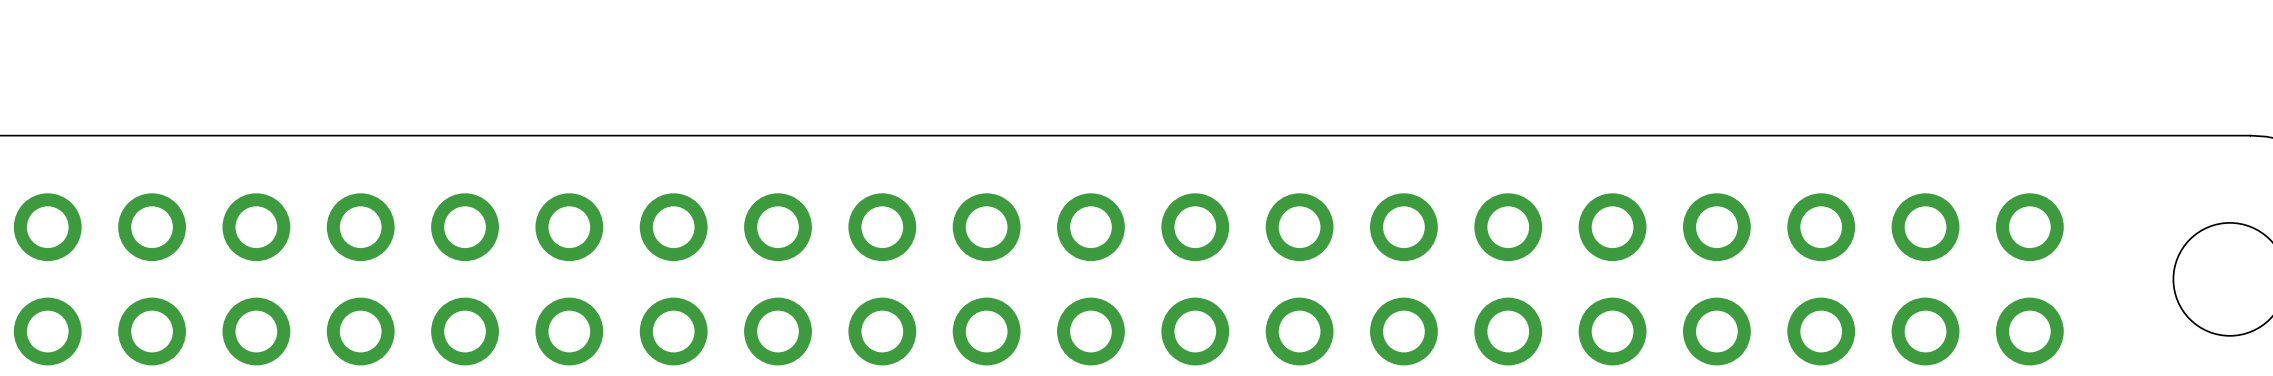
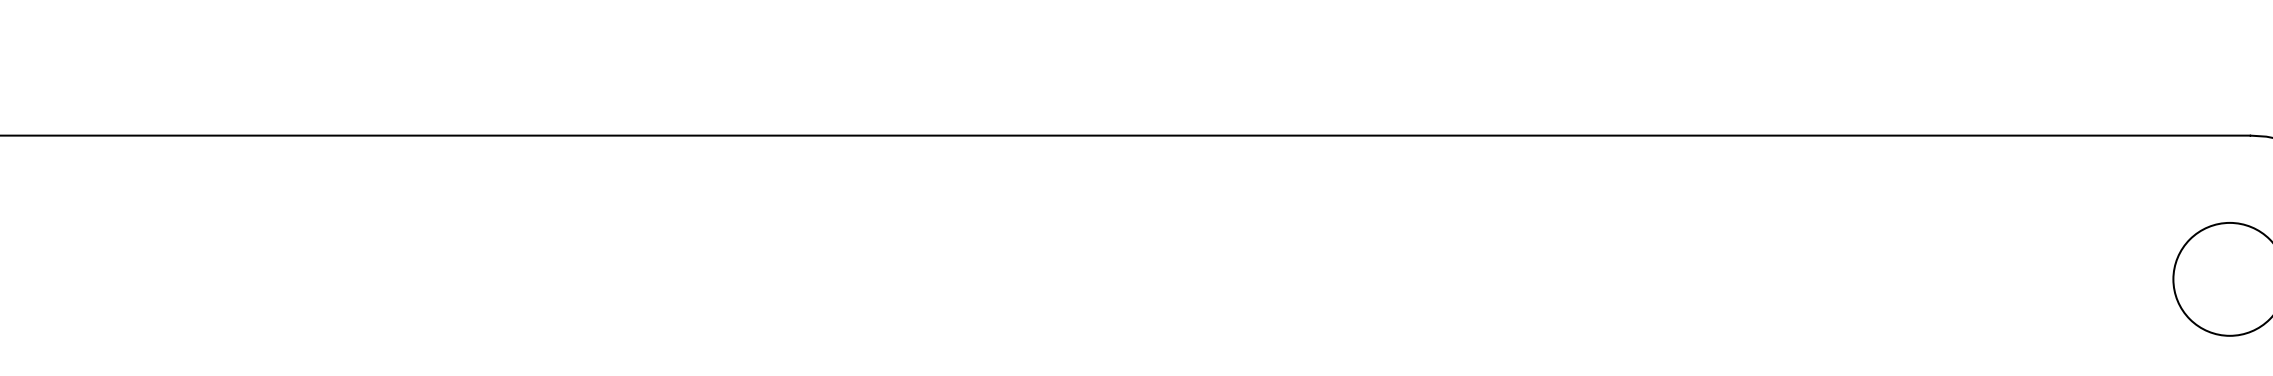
part: (1038, 279) -> none

